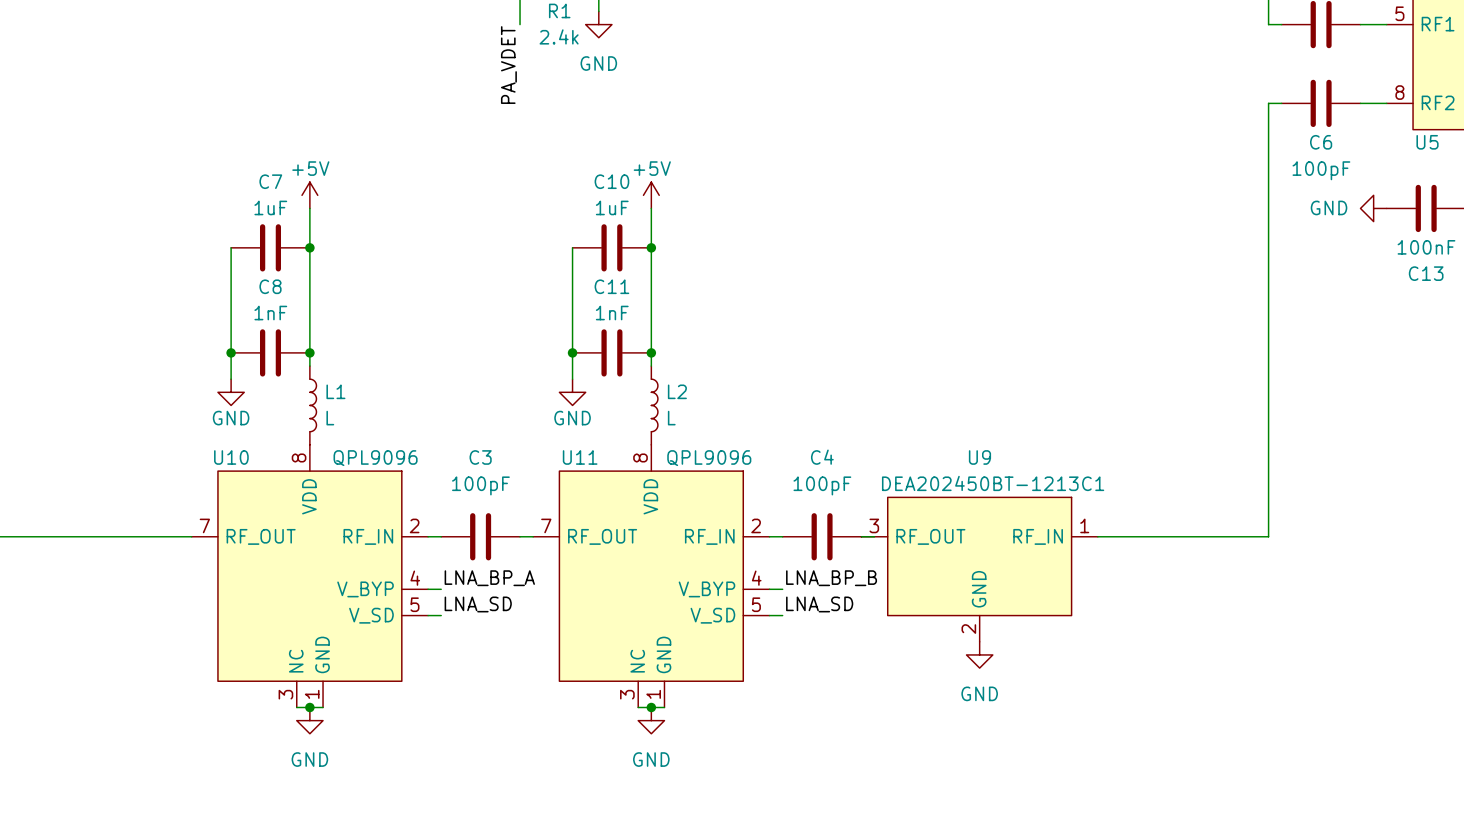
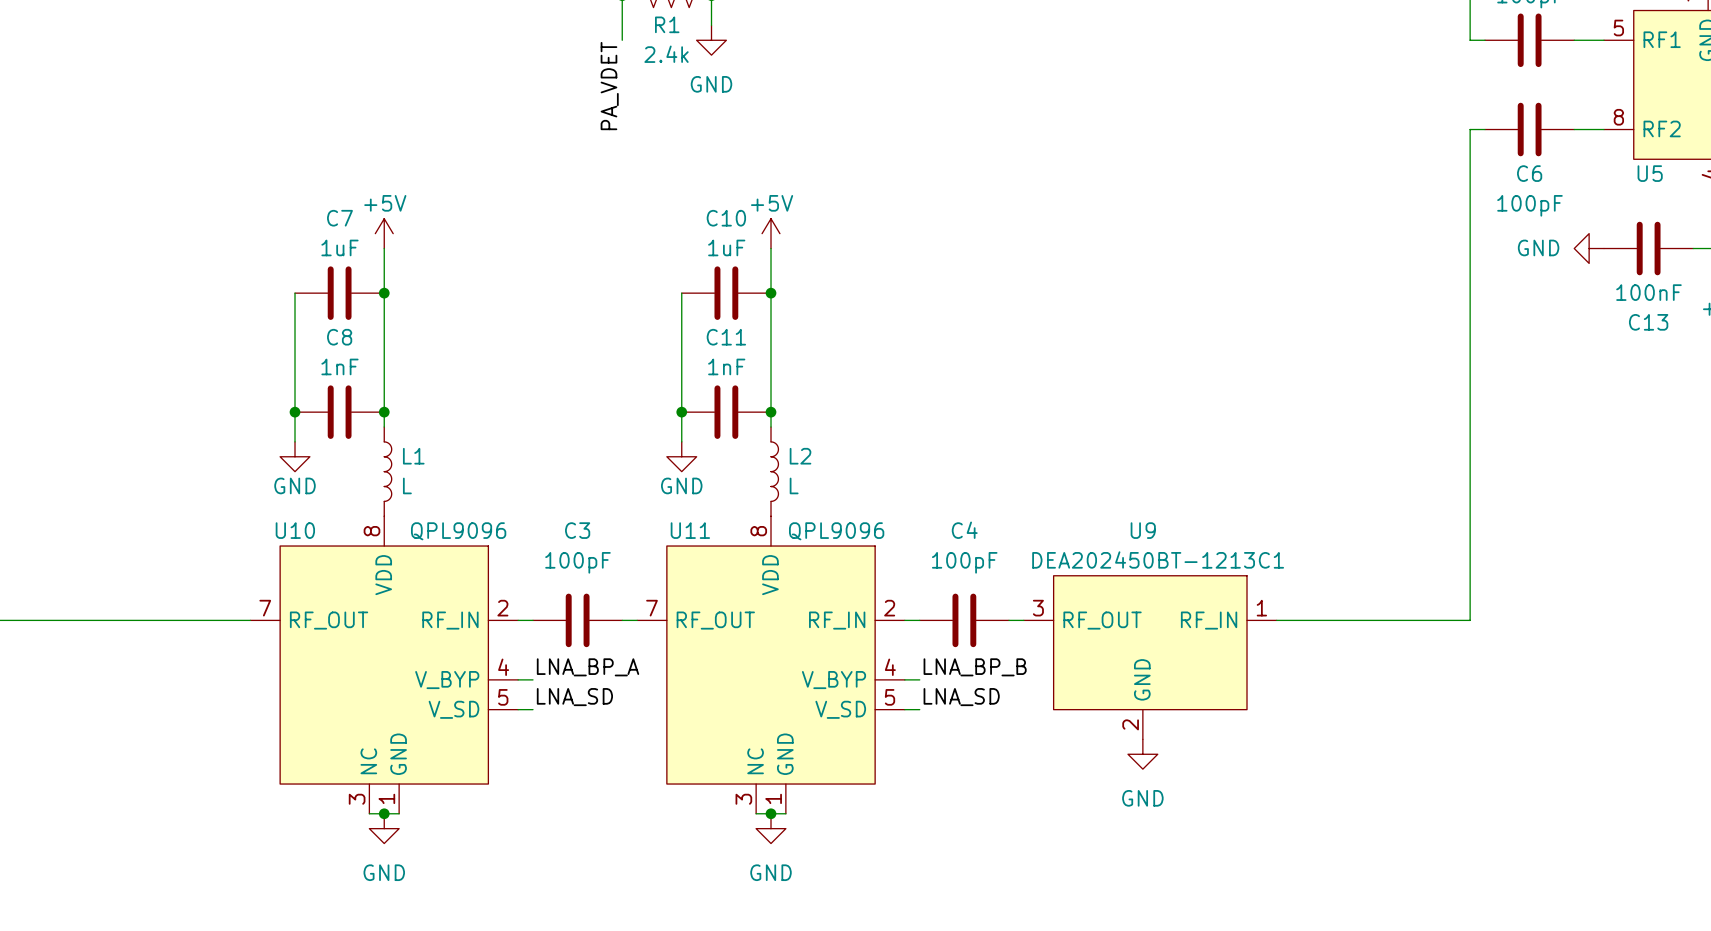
U9 symbol: [861, 497, 1098, 642] -> [1023, 575, 1277, 740]

